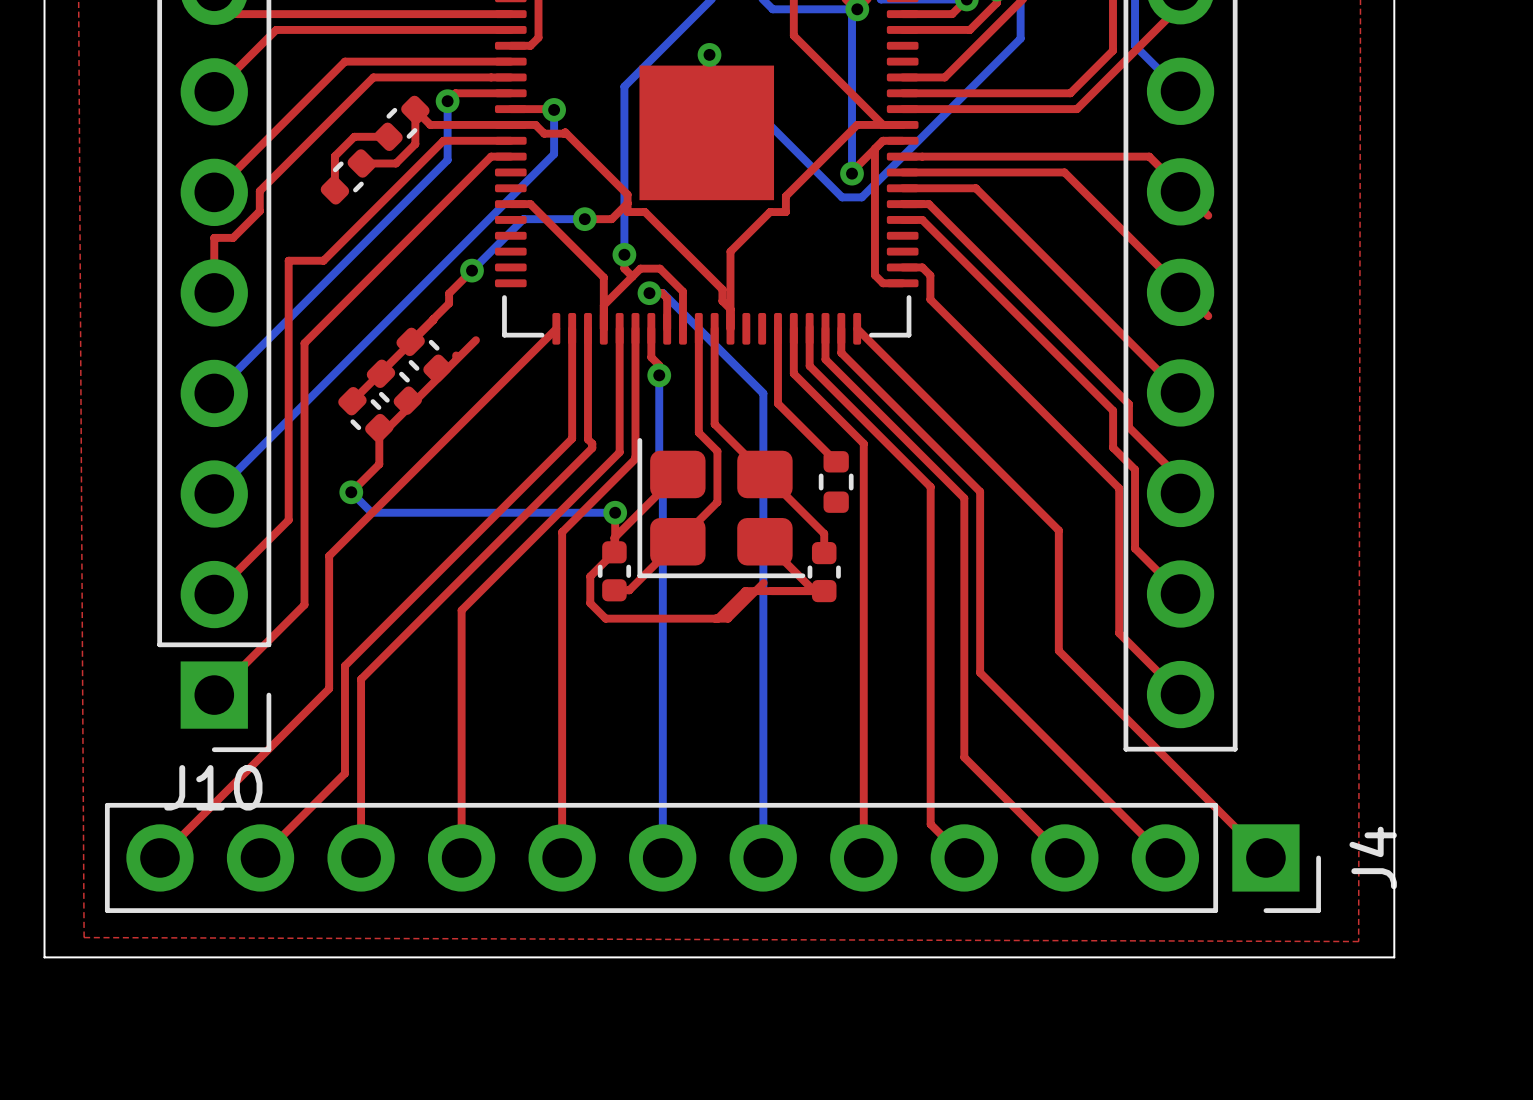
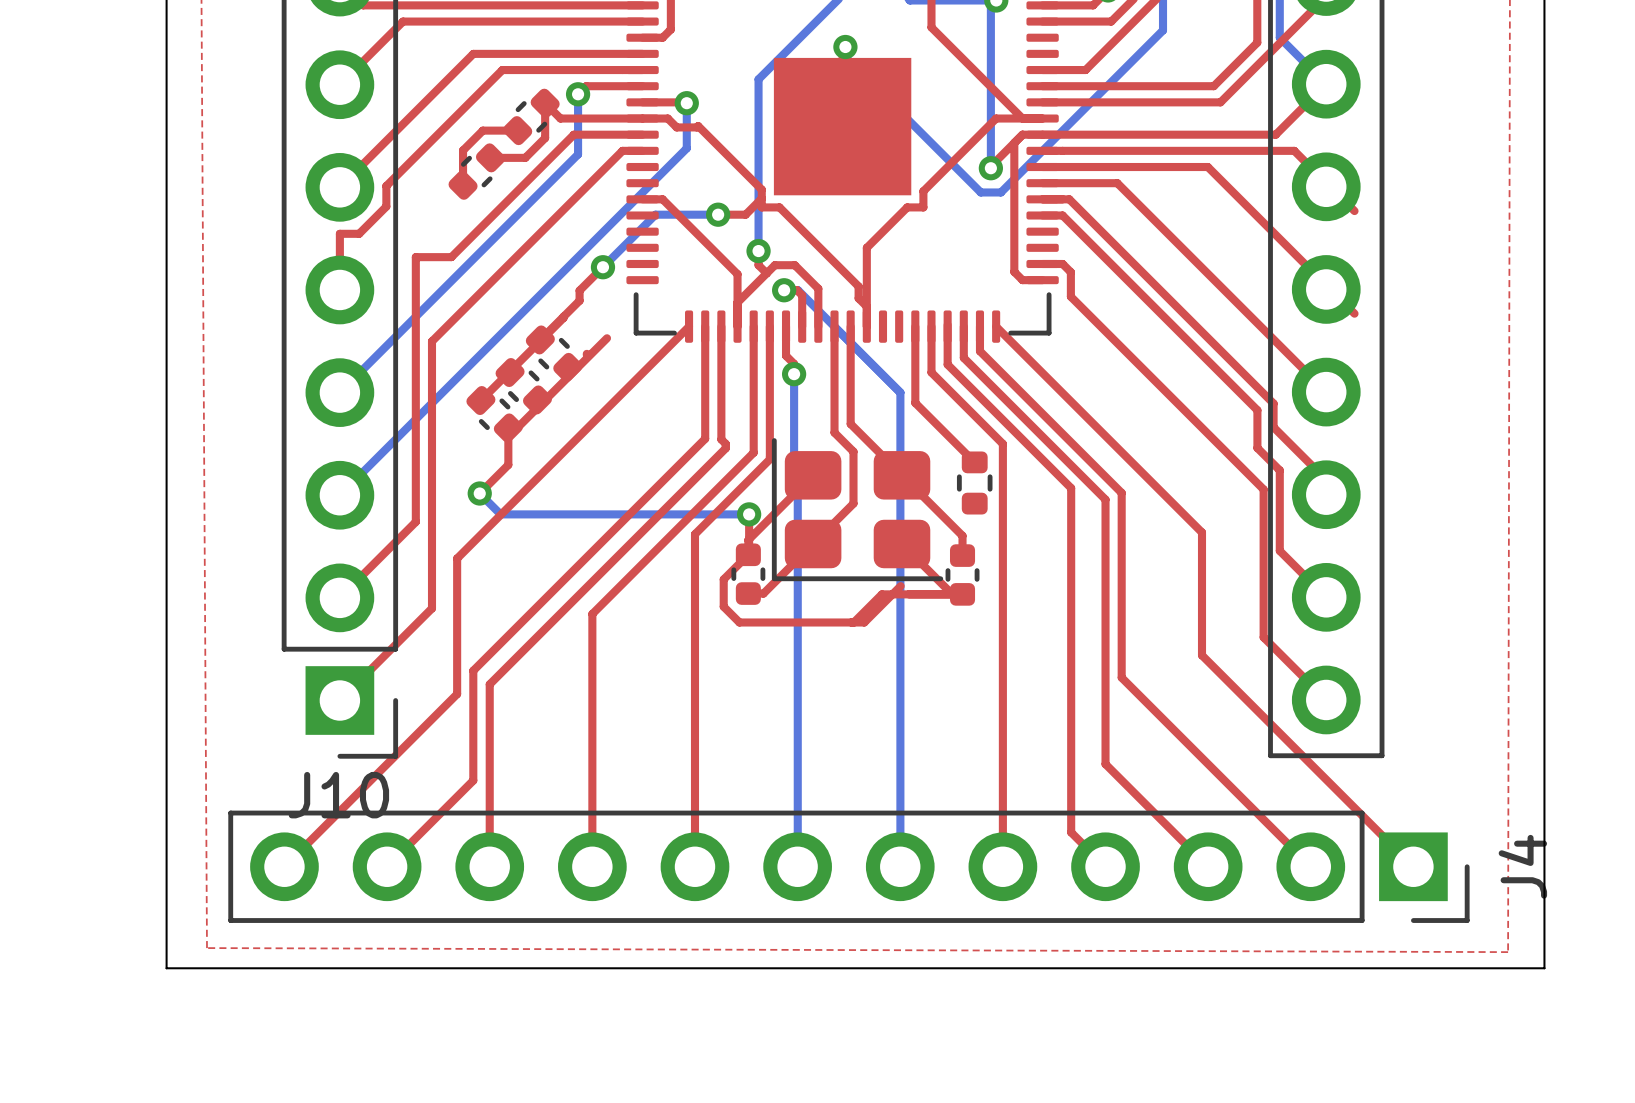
top track: none -> (1326, 84) (1275, 134) (1042, 134)

